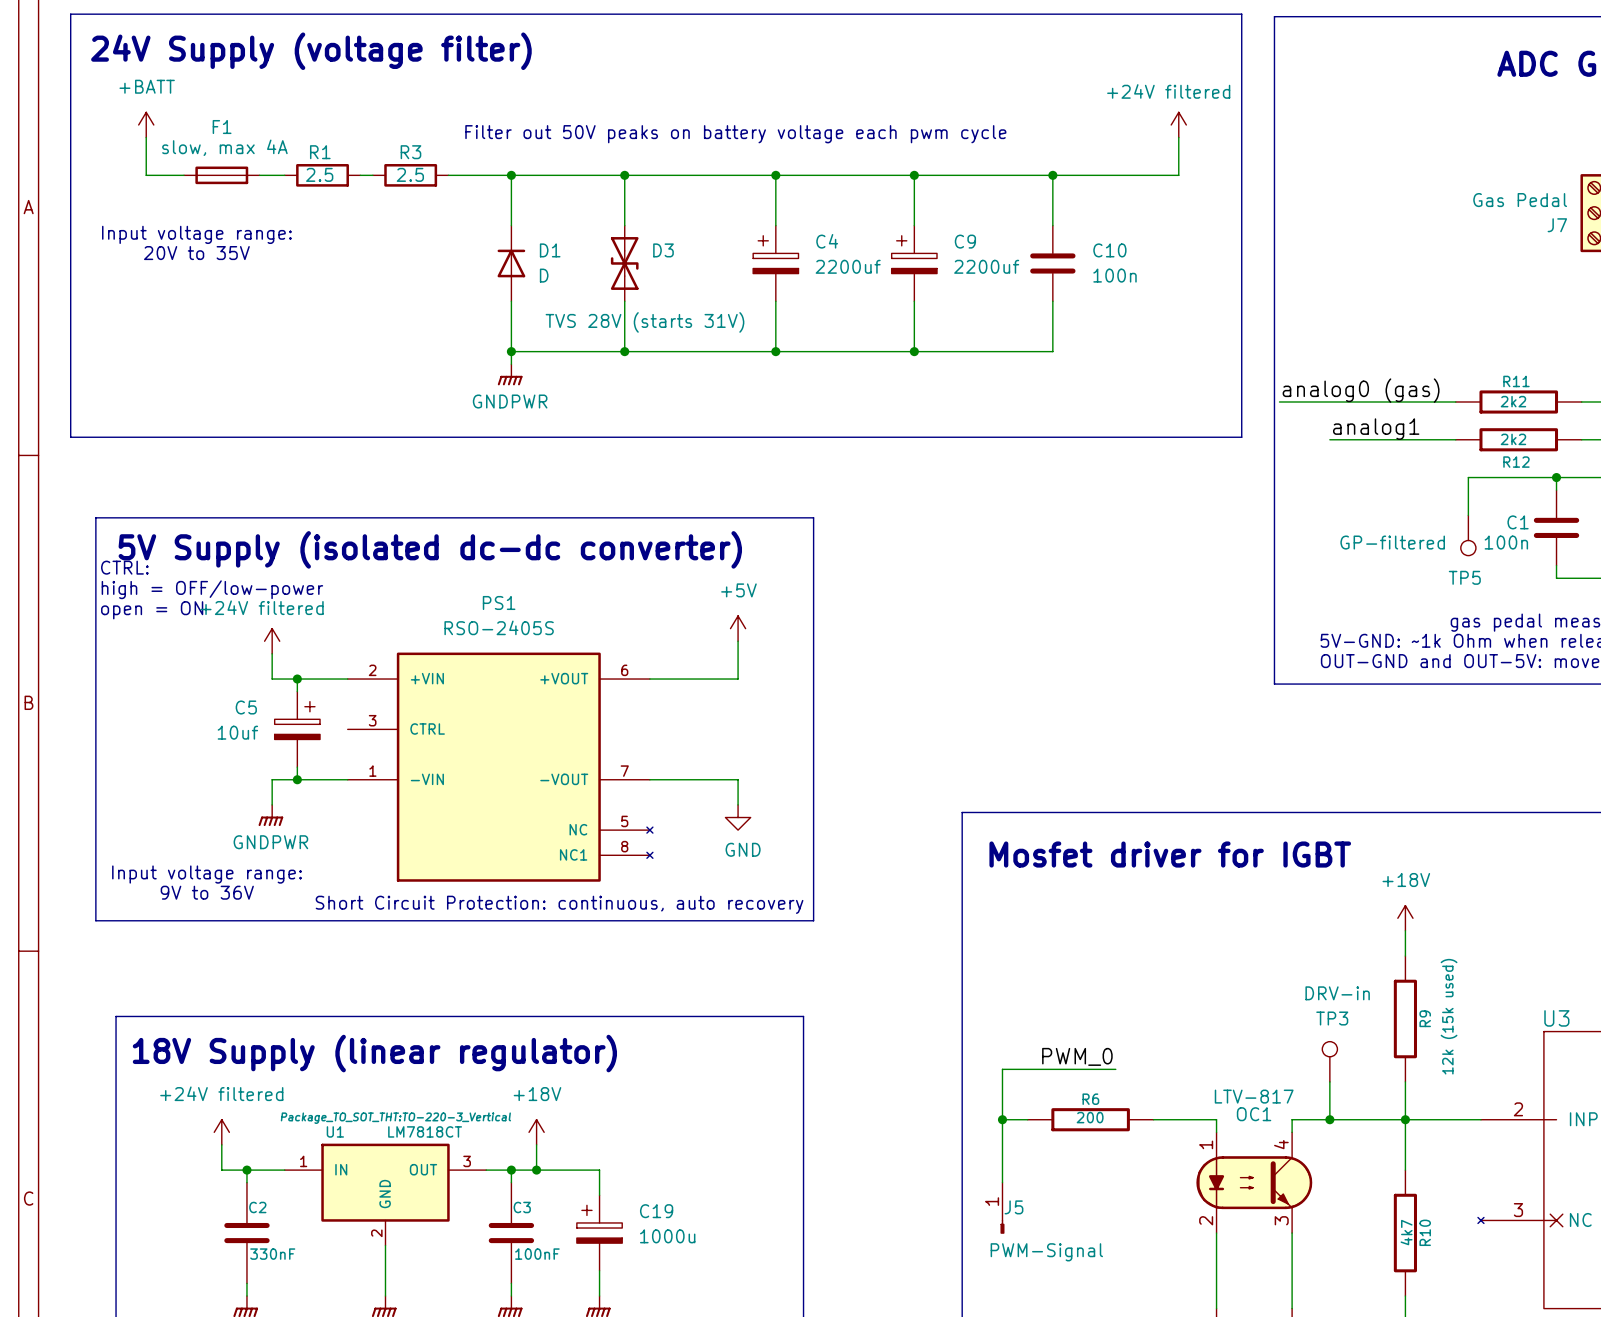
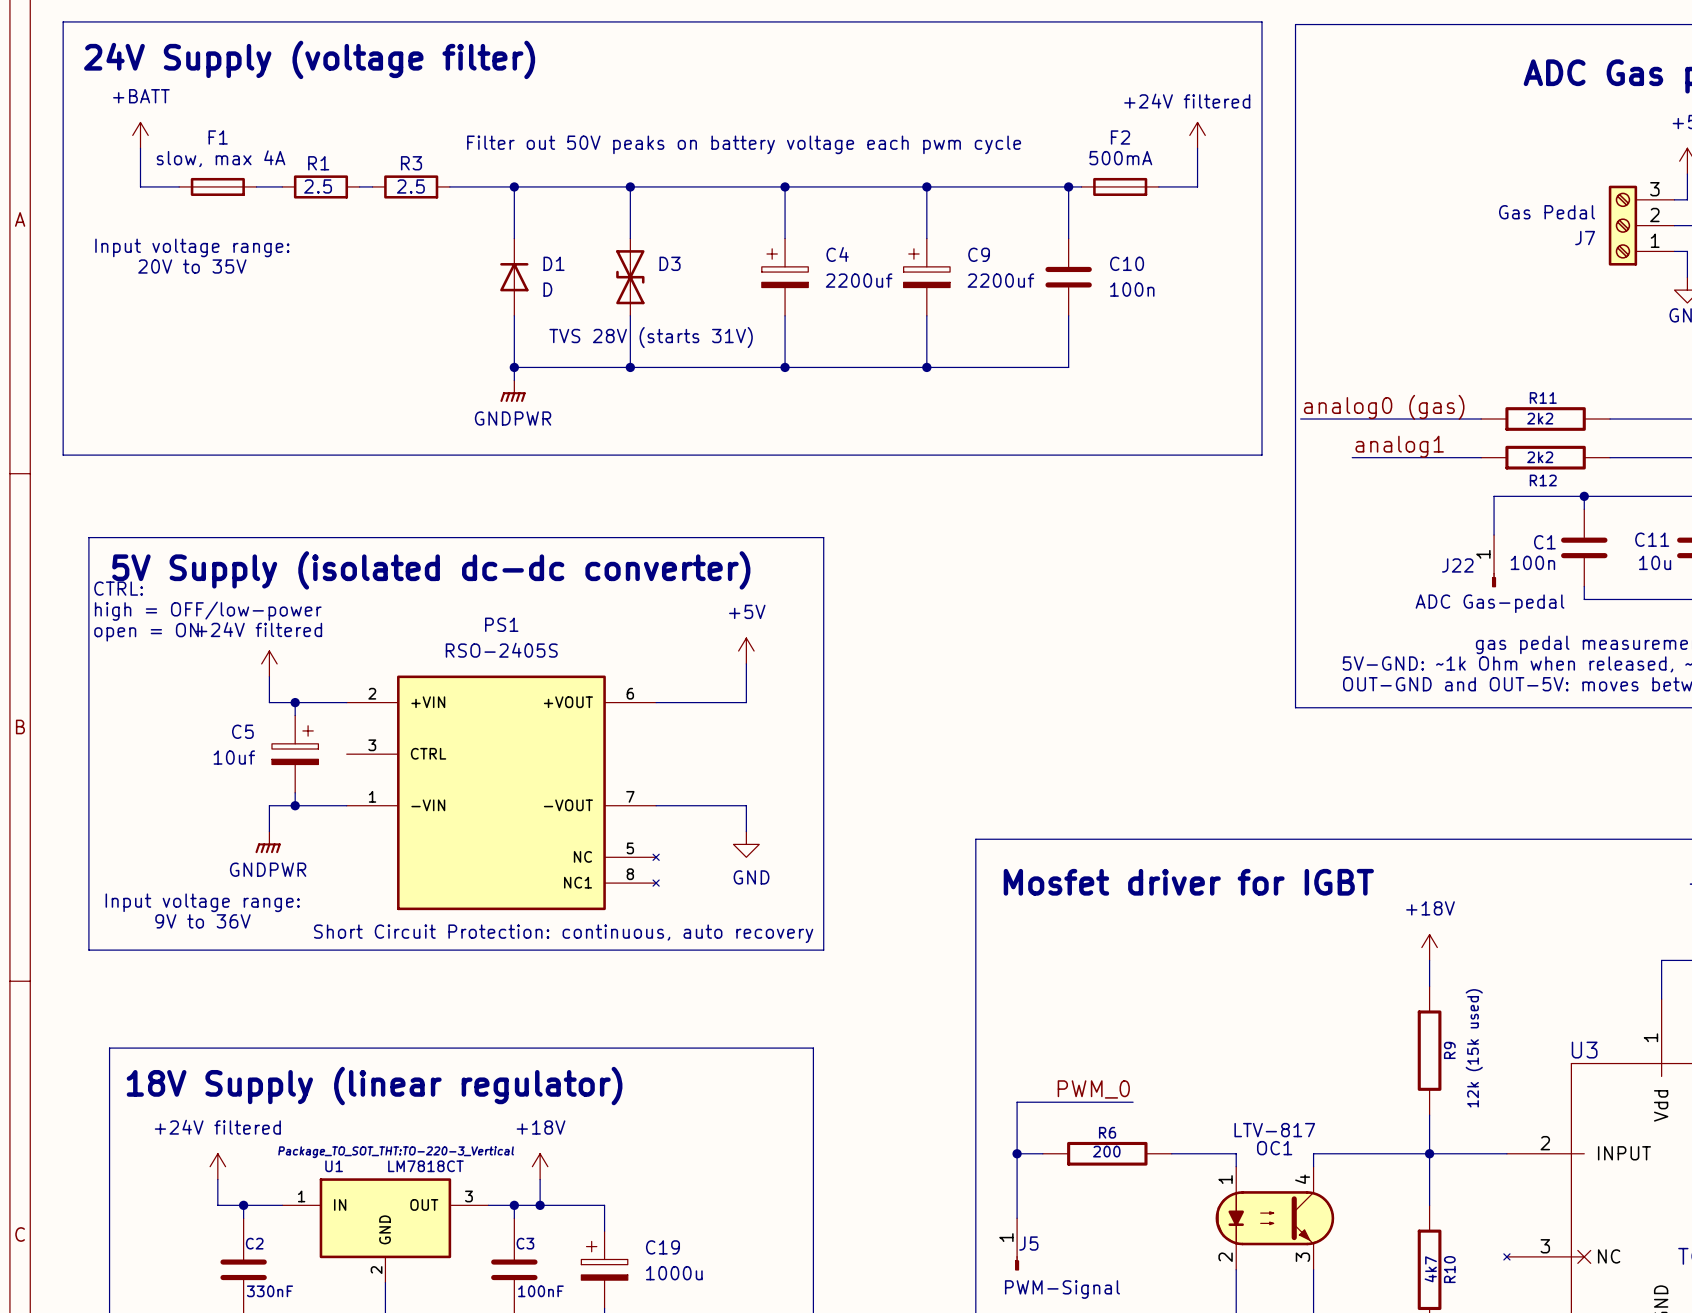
F2: none -> 500mA (1120, 186)
TP5: GP-filtered (1468, 535) -> none
J22: none -> ADC Gas-pedal (1494, 561)
TP3: DRV-in (1329, 1061) -> none
wire: (1329, 1081) (1329, 1119) -> none
junction: (1329, 1119) -> none

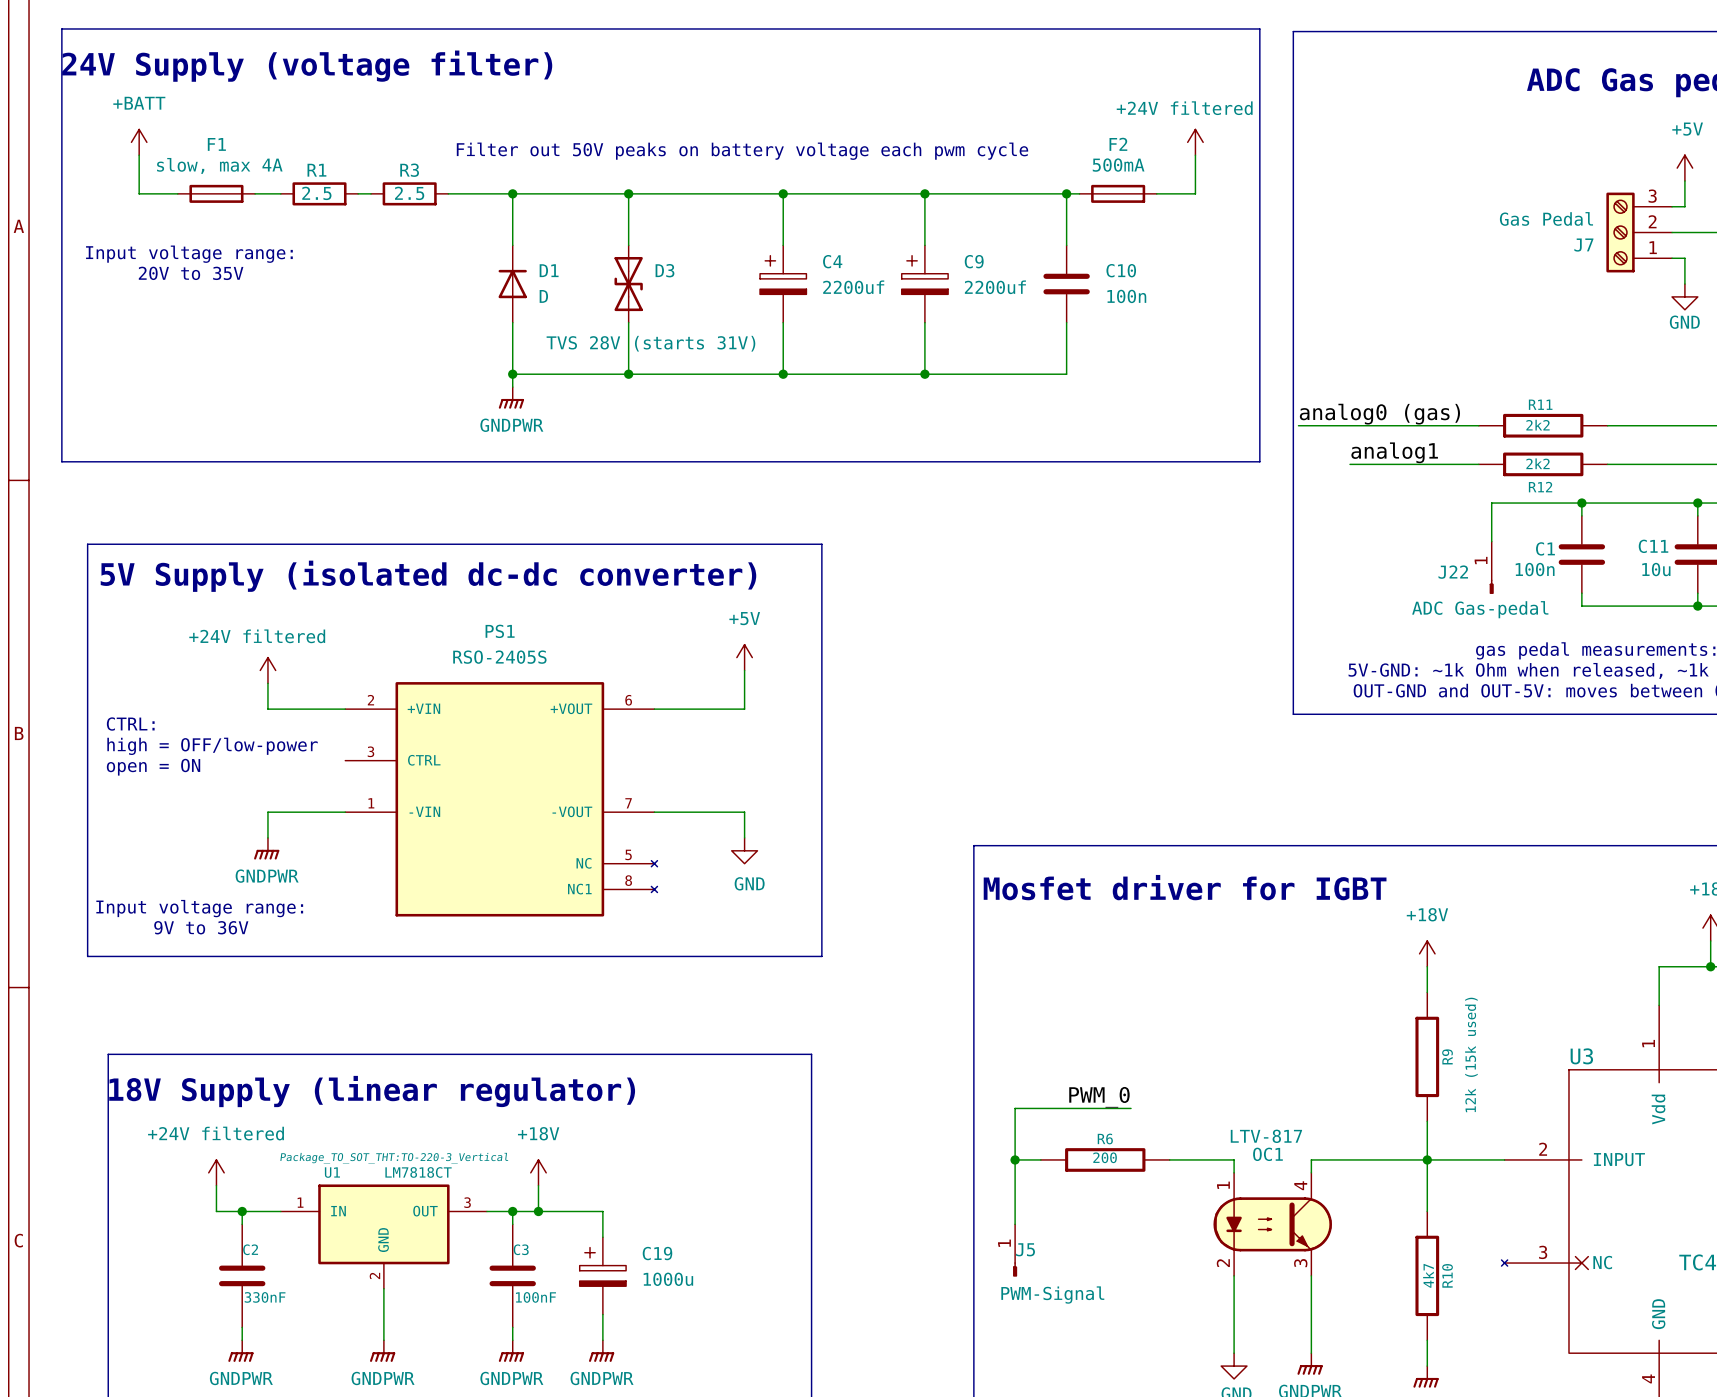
text position: CTRL: (118, 588) -> CTRL: (130, 724)
text position: high = OFF/low-power (208, 611) -> high = OFF/low-power (212, 746)
text position: open = ON (146, 632) -> open = ON (153, 767)
wire: (295, 702) (295, 715) -> none
junction: (295, 702) -> none
C5: 10uf (295, 754) -> none
wire: (295, 792) (295, 805) -> none
junction: (295, 805) -> none
text: Short Circuit Protection: continuous, auto recovery (563, 933) -> none

